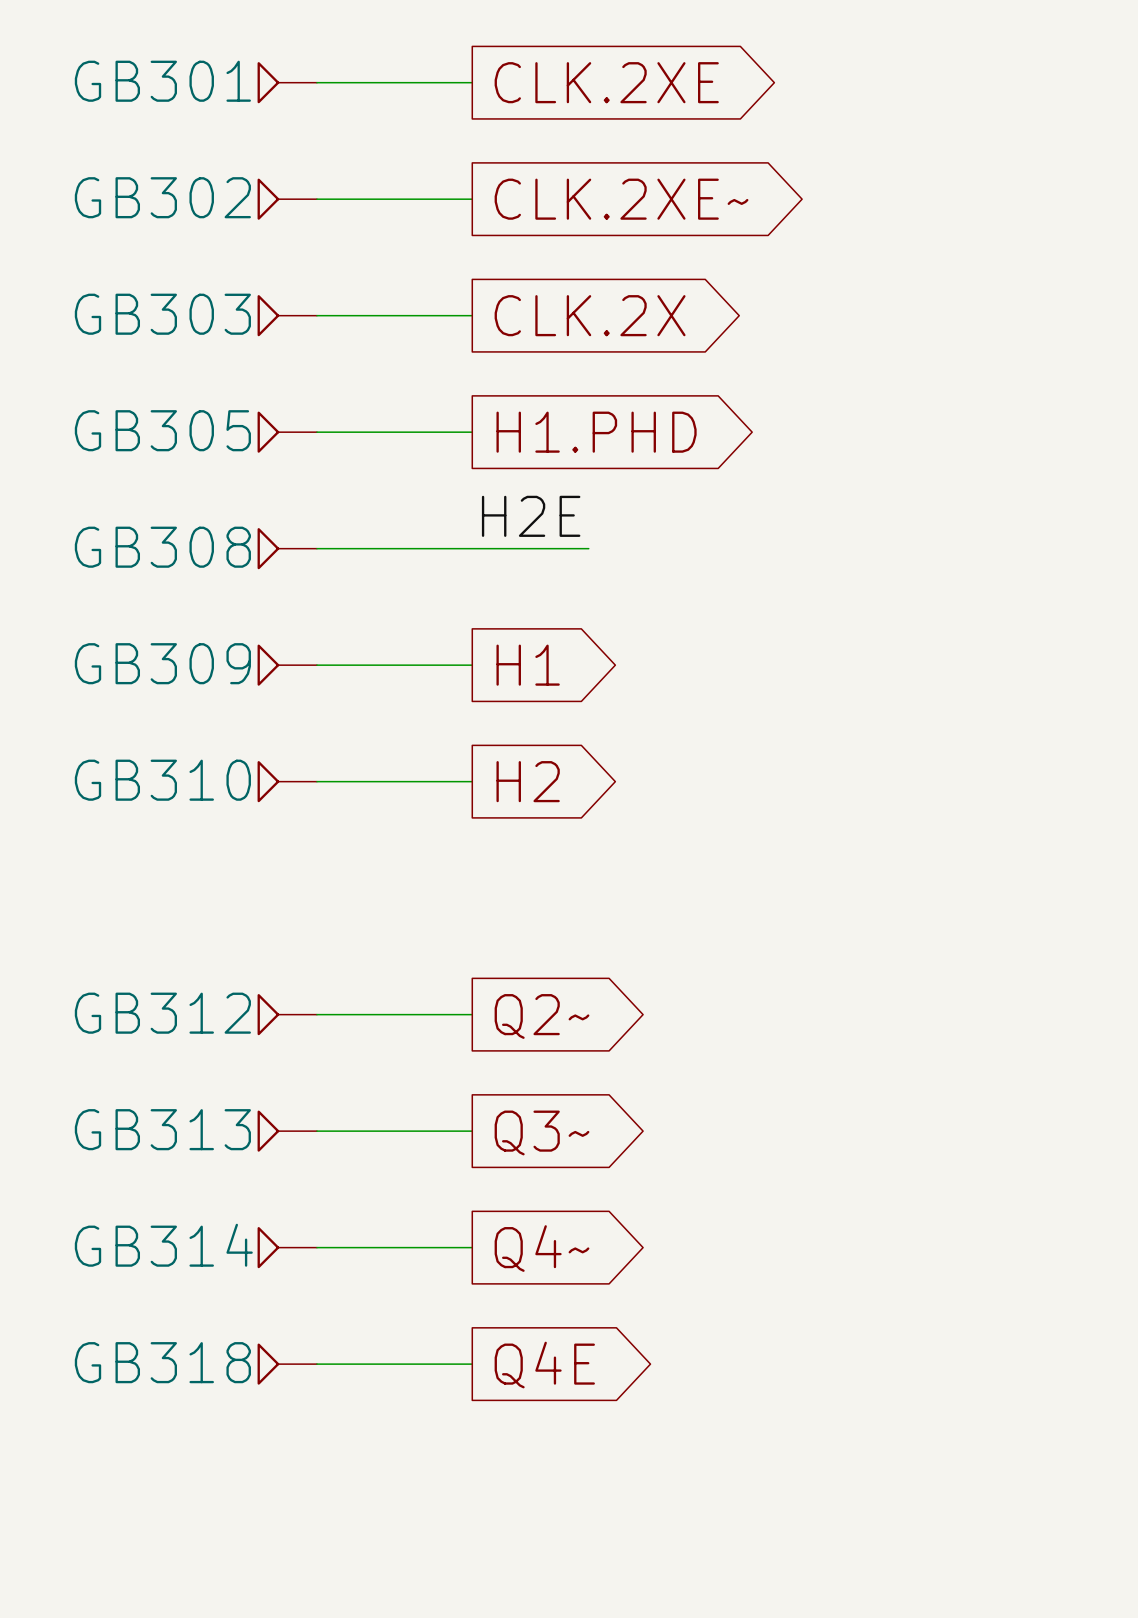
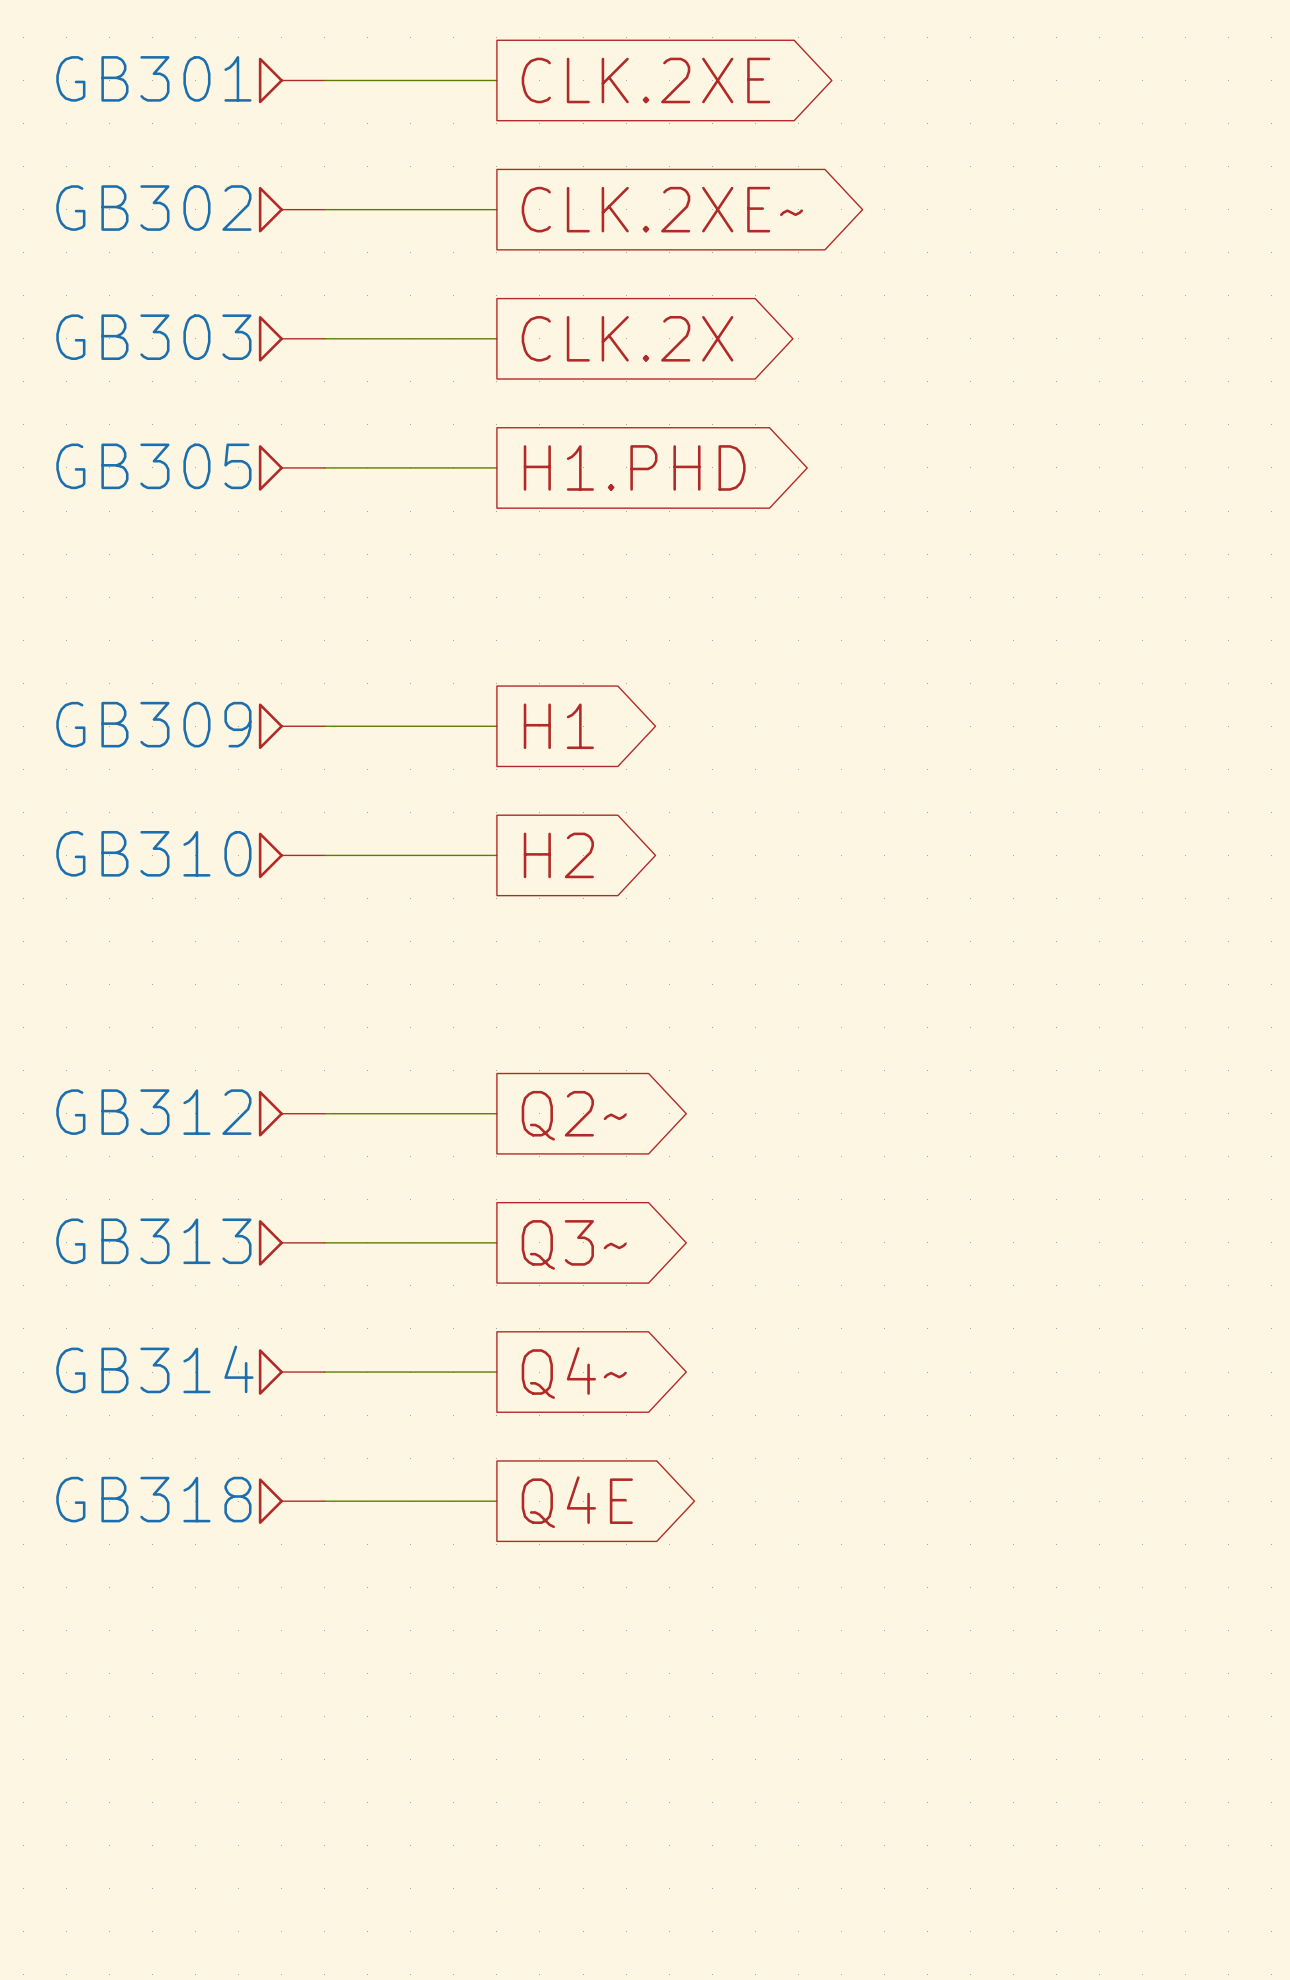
label: H2E (531, 516) -> none
GB308: (287, 548) -> none
wire: (316, 548) (588, 548) -> none

